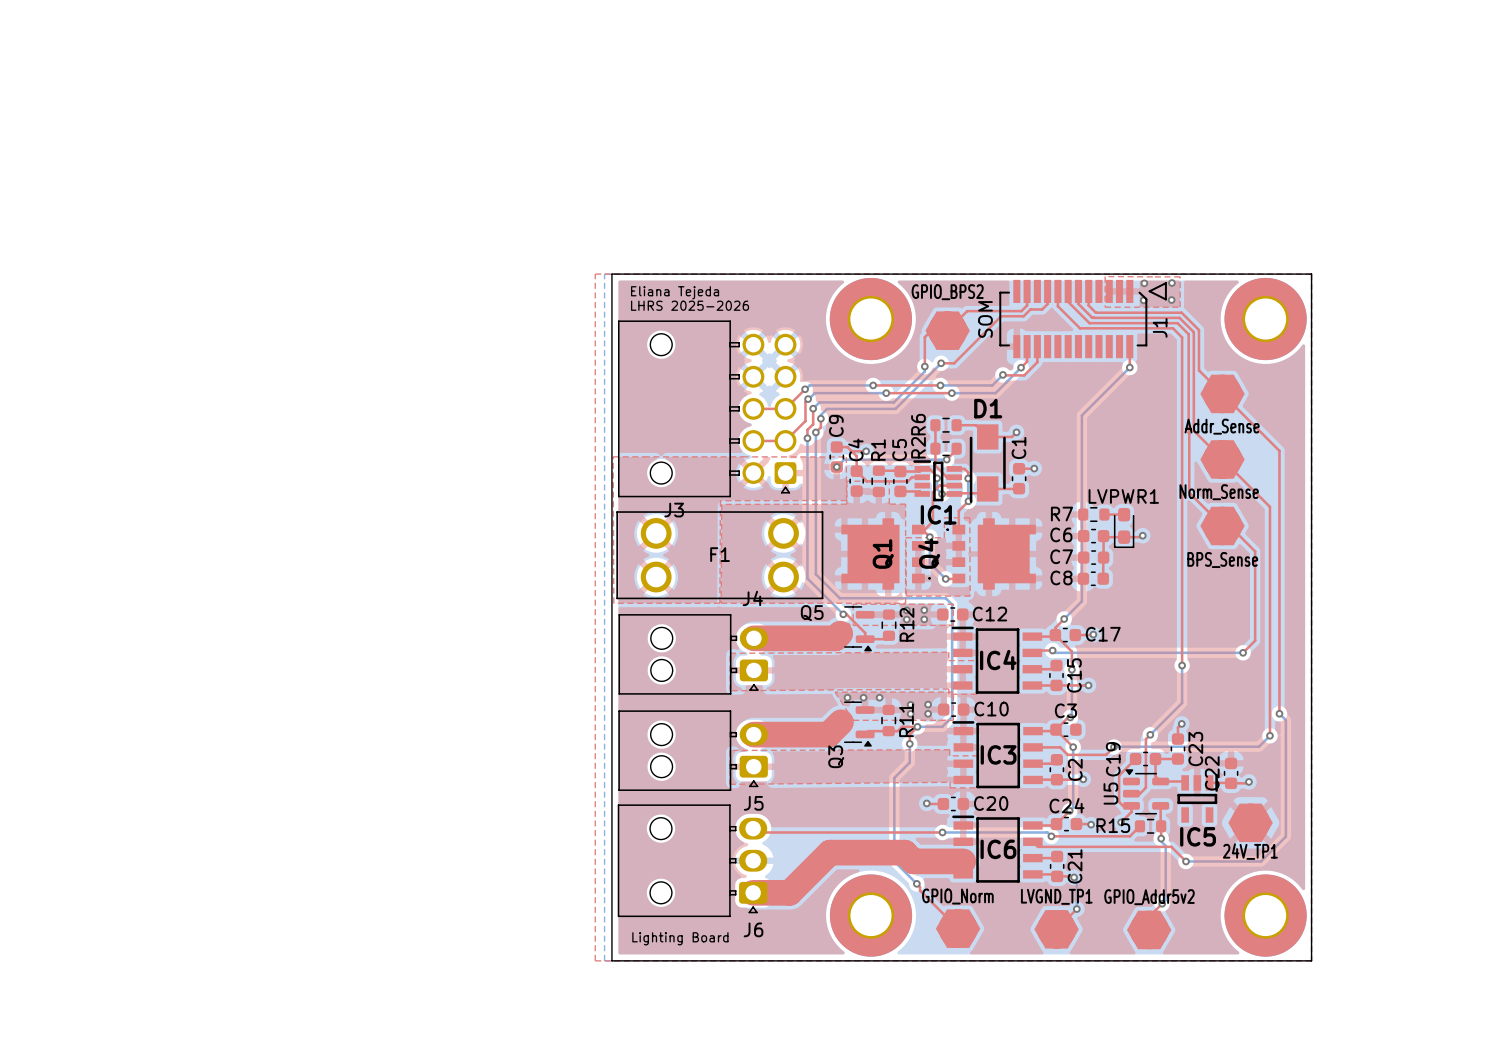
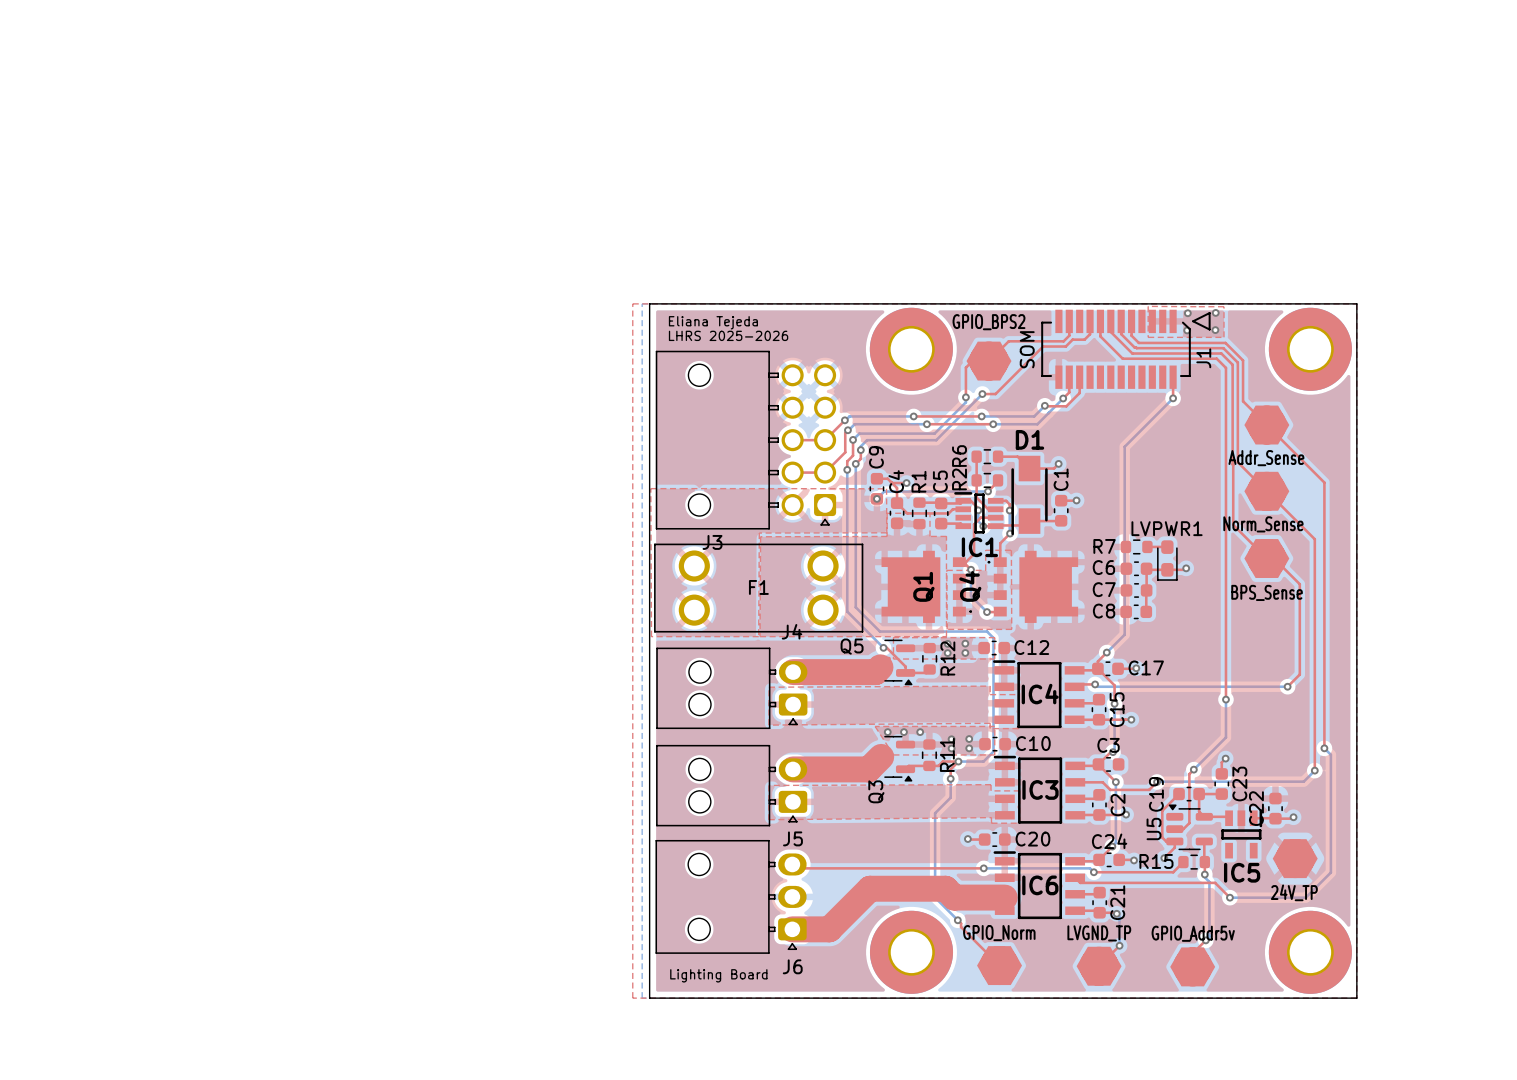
24V_TP1 name: 24V_TP1 (1250, 851) -> 24V_TP (1294, 892)
LVGND_TP1 name: LVGND_TP1 (1056, 896) -> LVGND_TP (1099, 933)
GPIO_Addr5v2 name: GPIO_Addr5v2 (1149, 897) -> GPIO_Addr5v (1193, 933)

